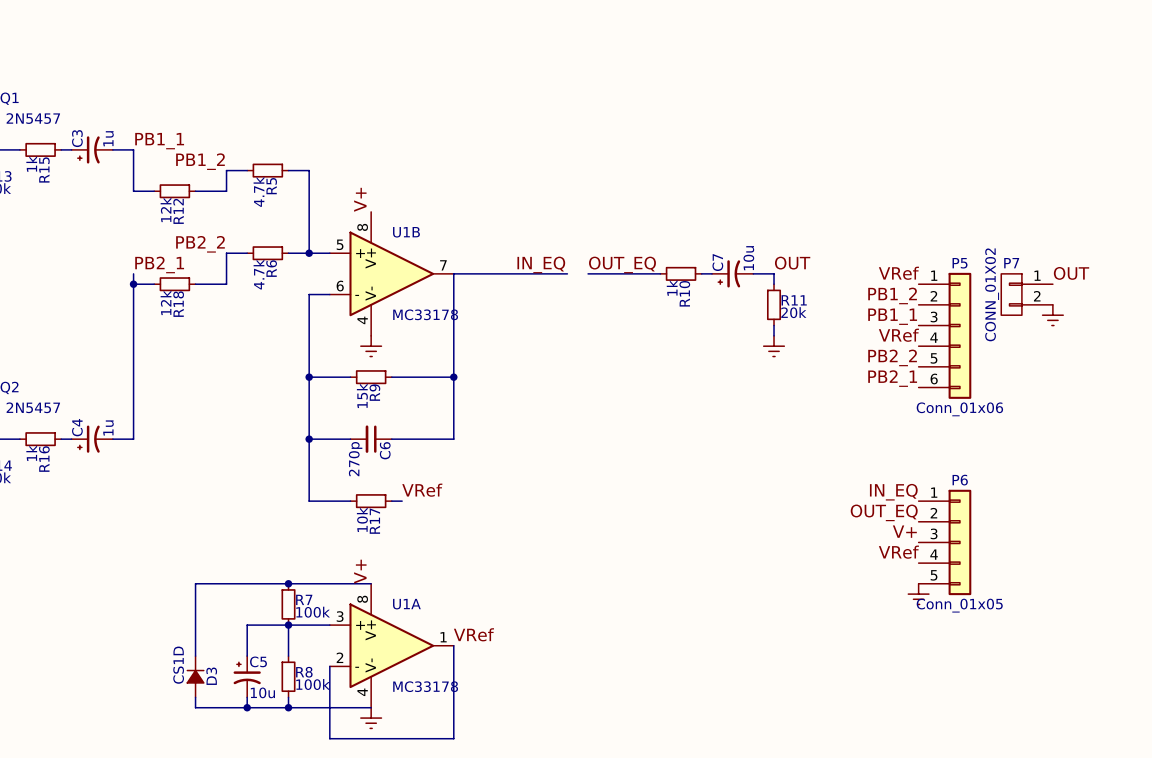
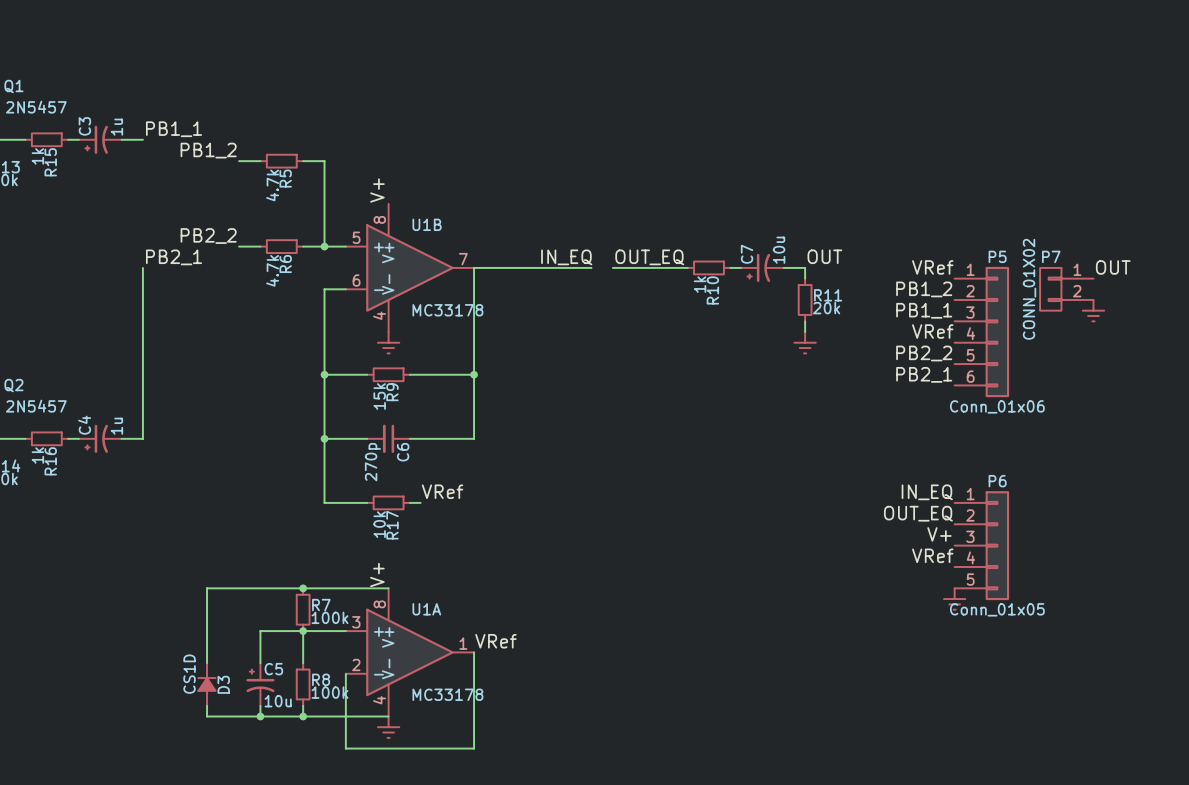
wire: (133, 149) (133, 191) (154, 191) -> none
wire: (226, 170) (226, 191) (195, 191) -> none
R12: 12k (174, 191) -> none
wire: (226, 253) (226, 284) (195, 284) -> none
wire: (133, 284) (154, 284) -> none
junction: (133, 284) -> none
R18: 12k (174, 284) -> none

